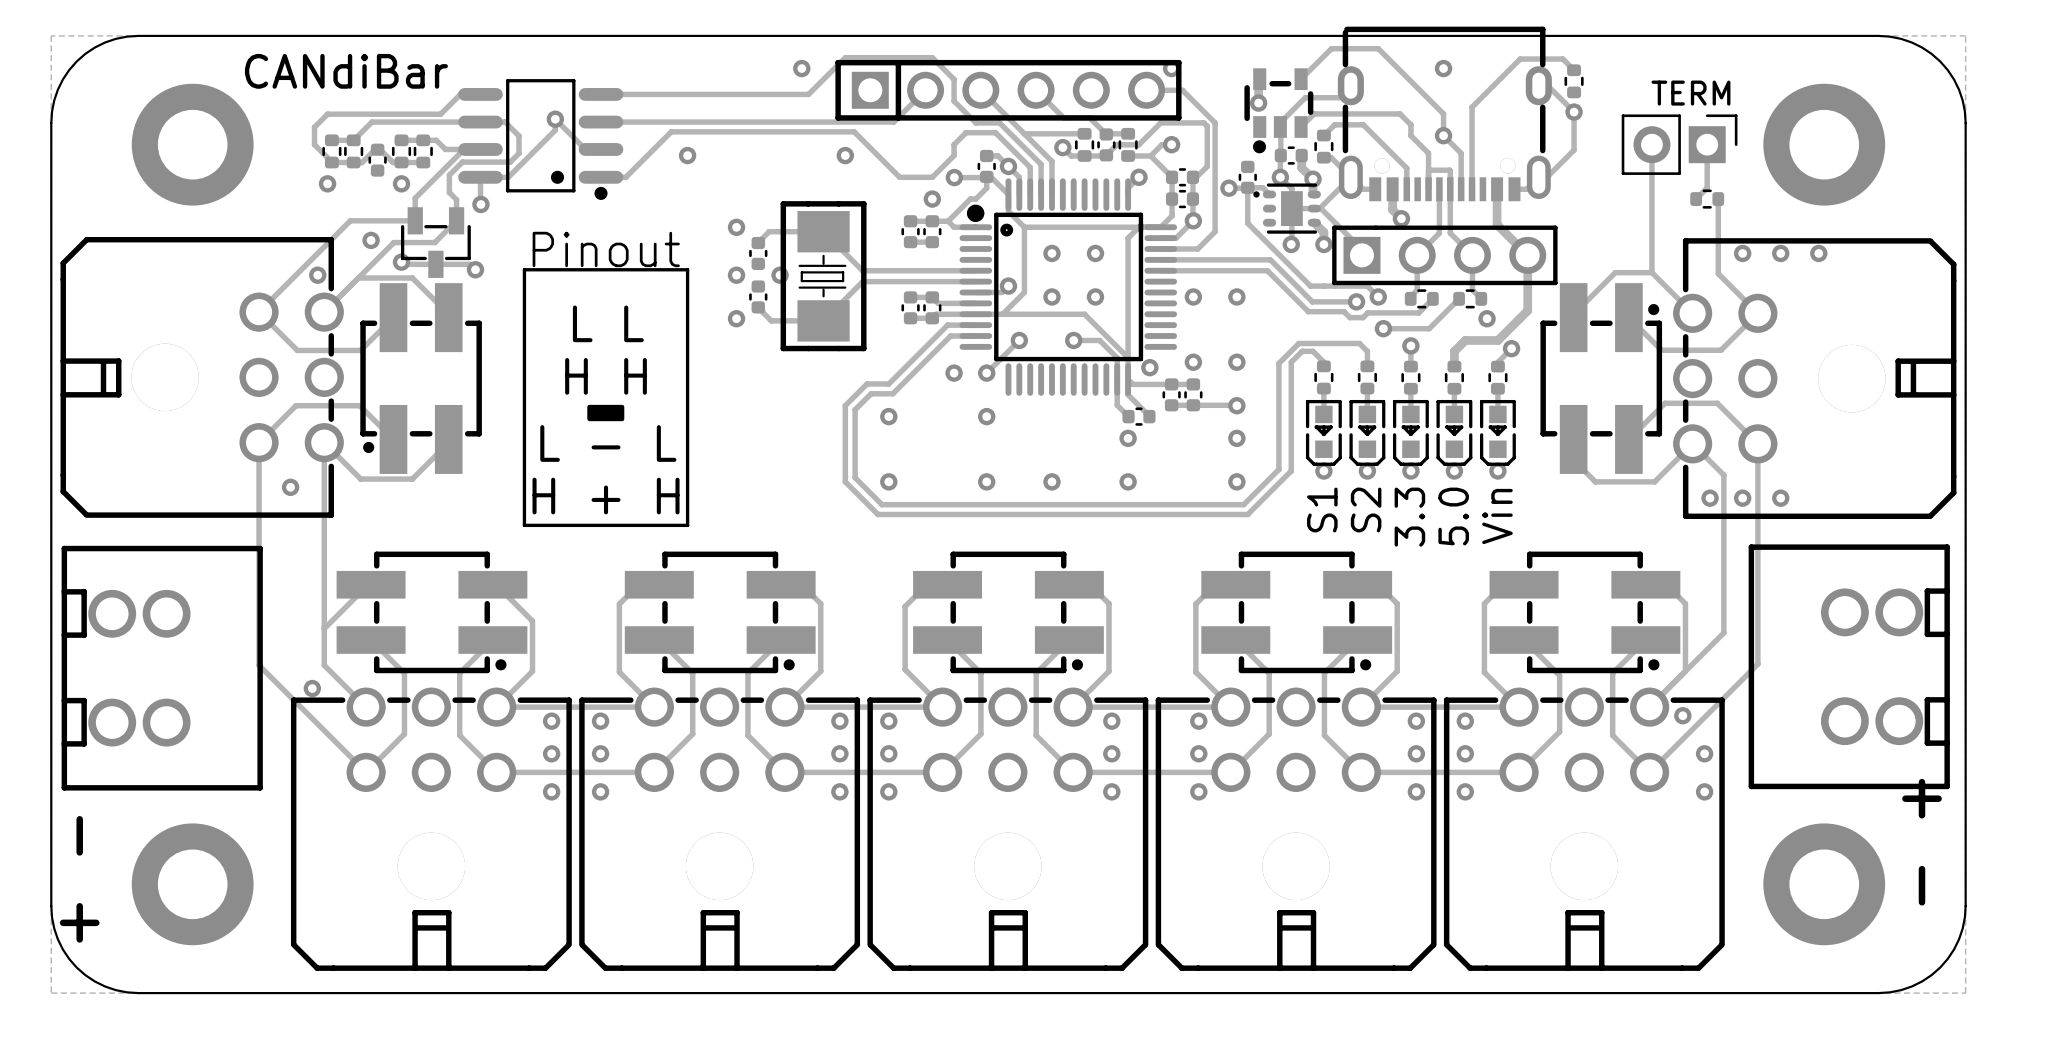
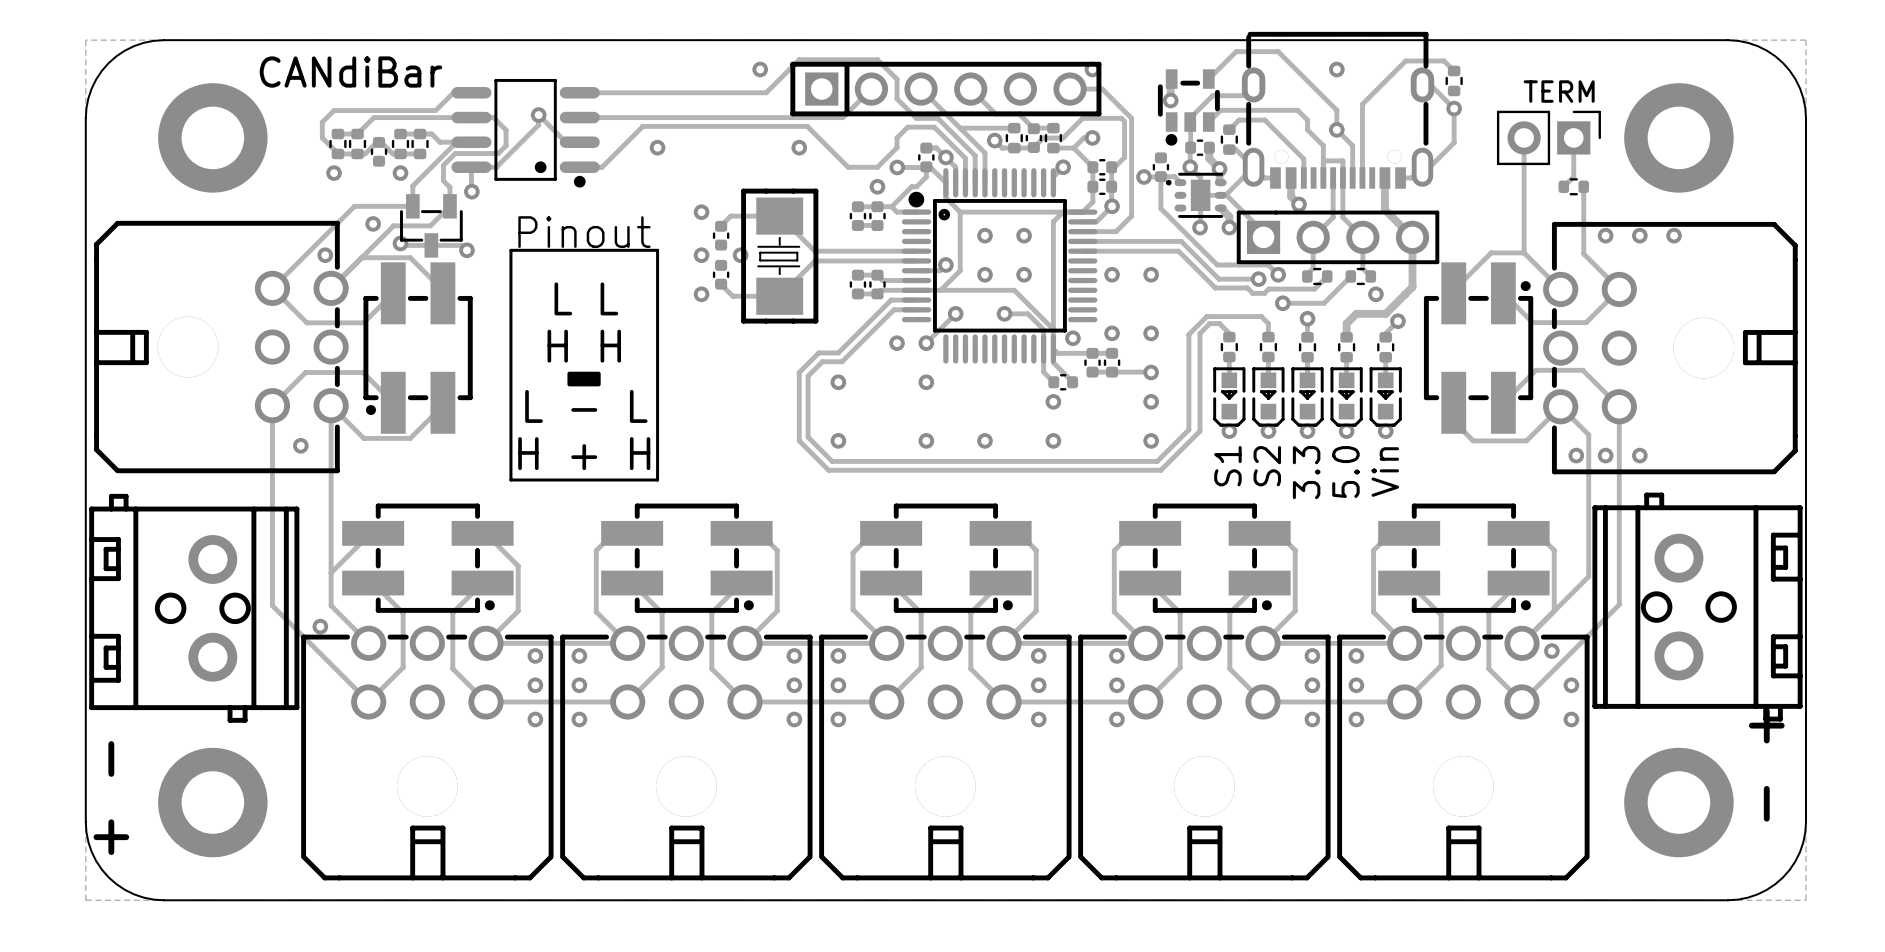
part footprint: [1748, 544, 1950, 790] -> [1592, 492, 1803, 722]
part footprint: [61, 545, 263, 791] -> [89, 493, 300, 723]

